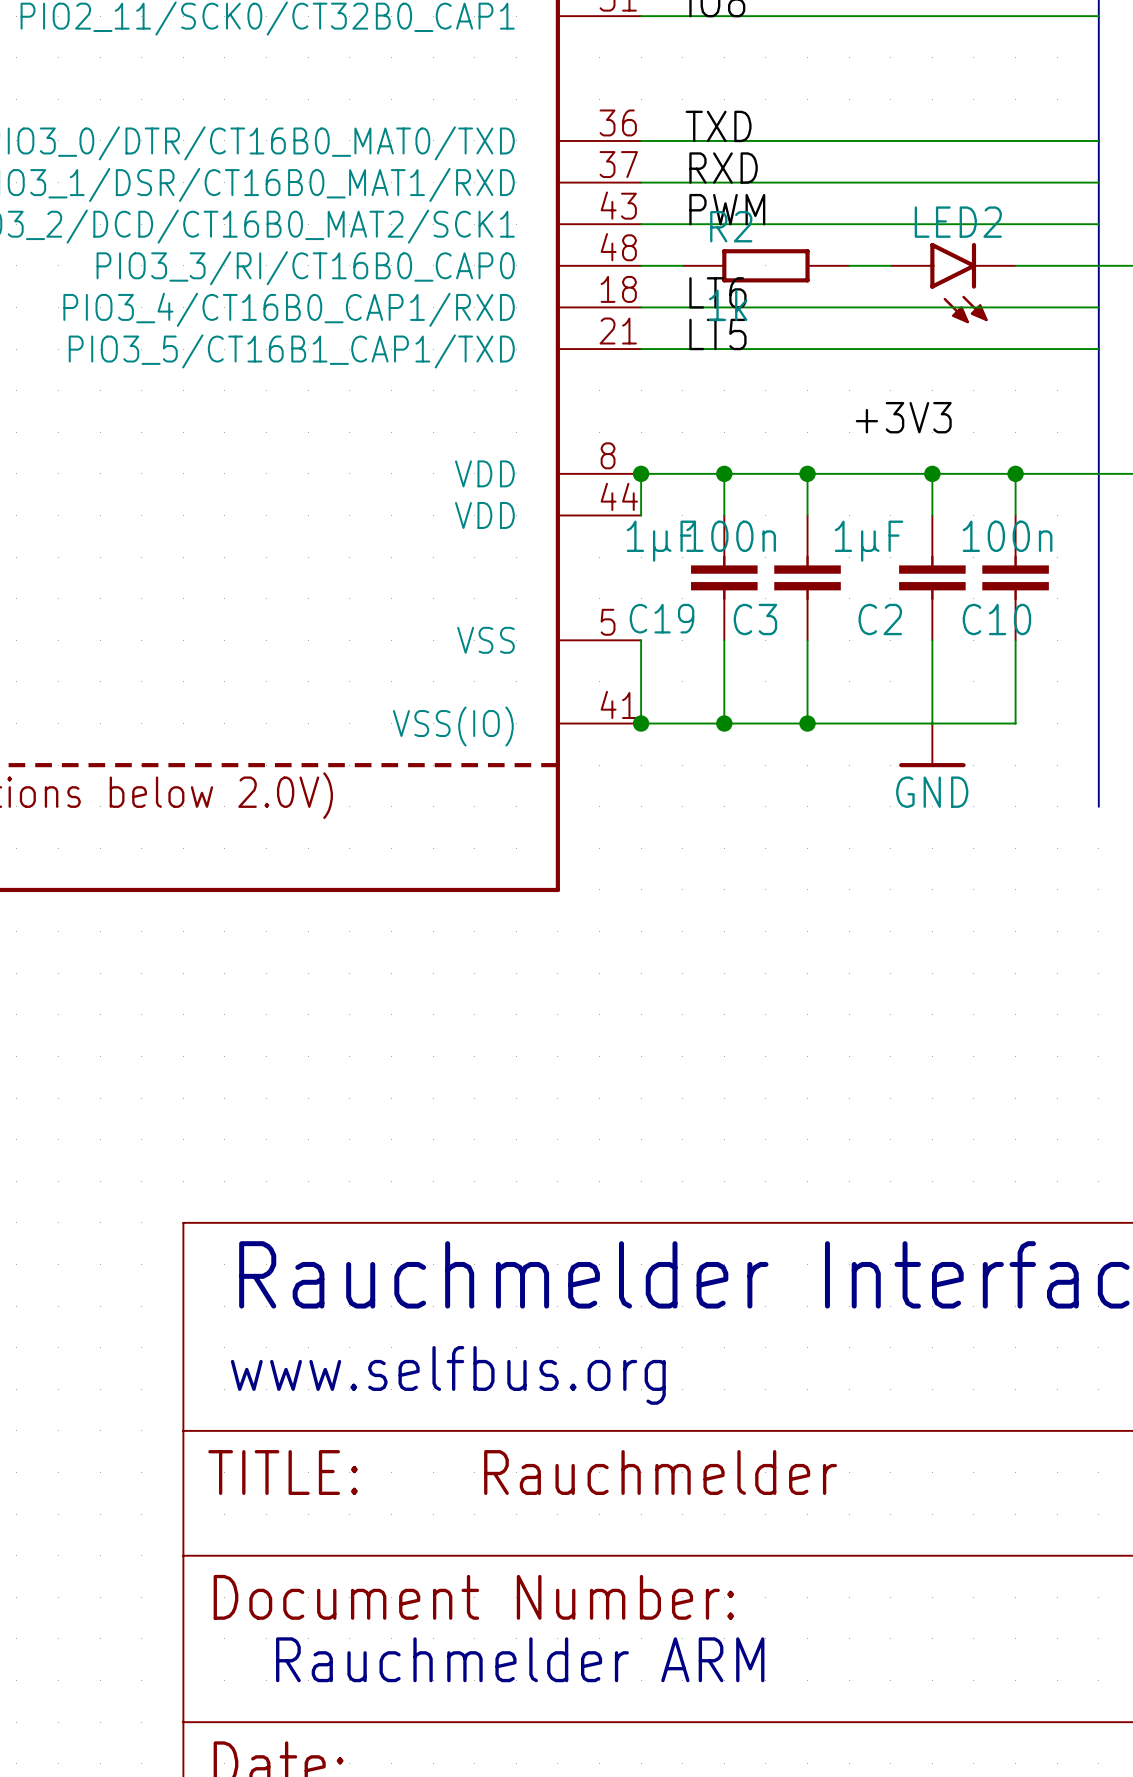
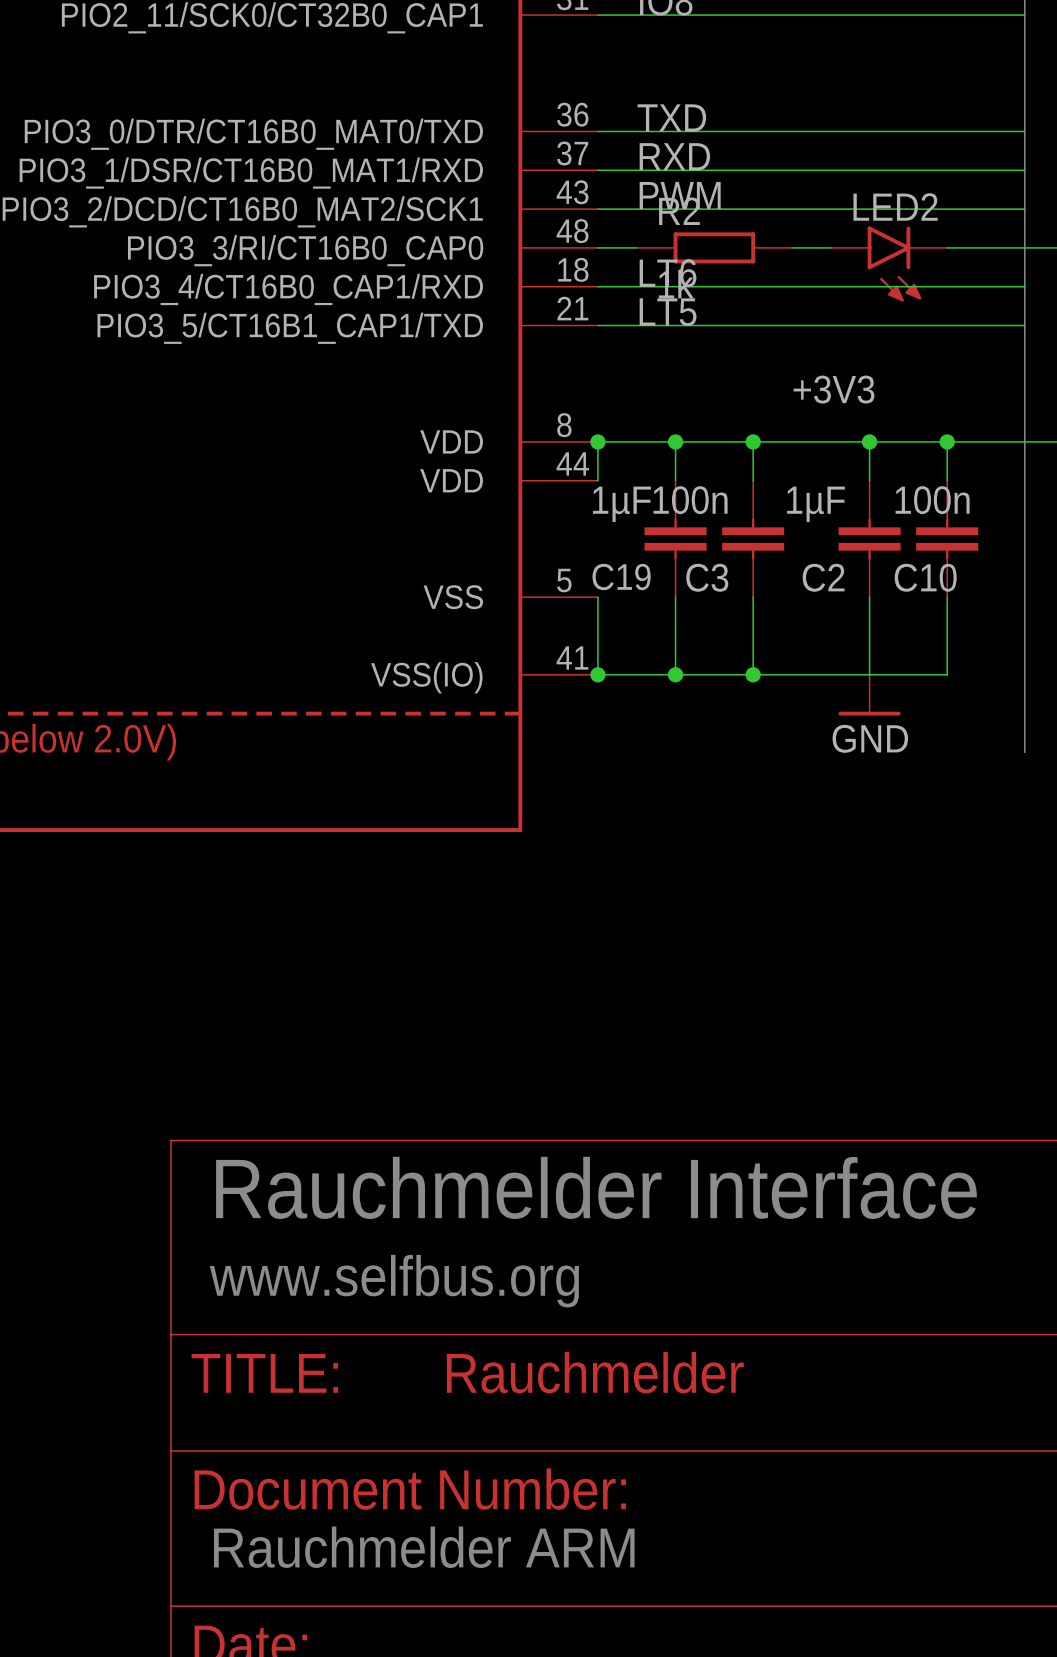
text position: Rauchmelder ARM (520, 1659) -> Rauchmelder ARM (424, 1547)

